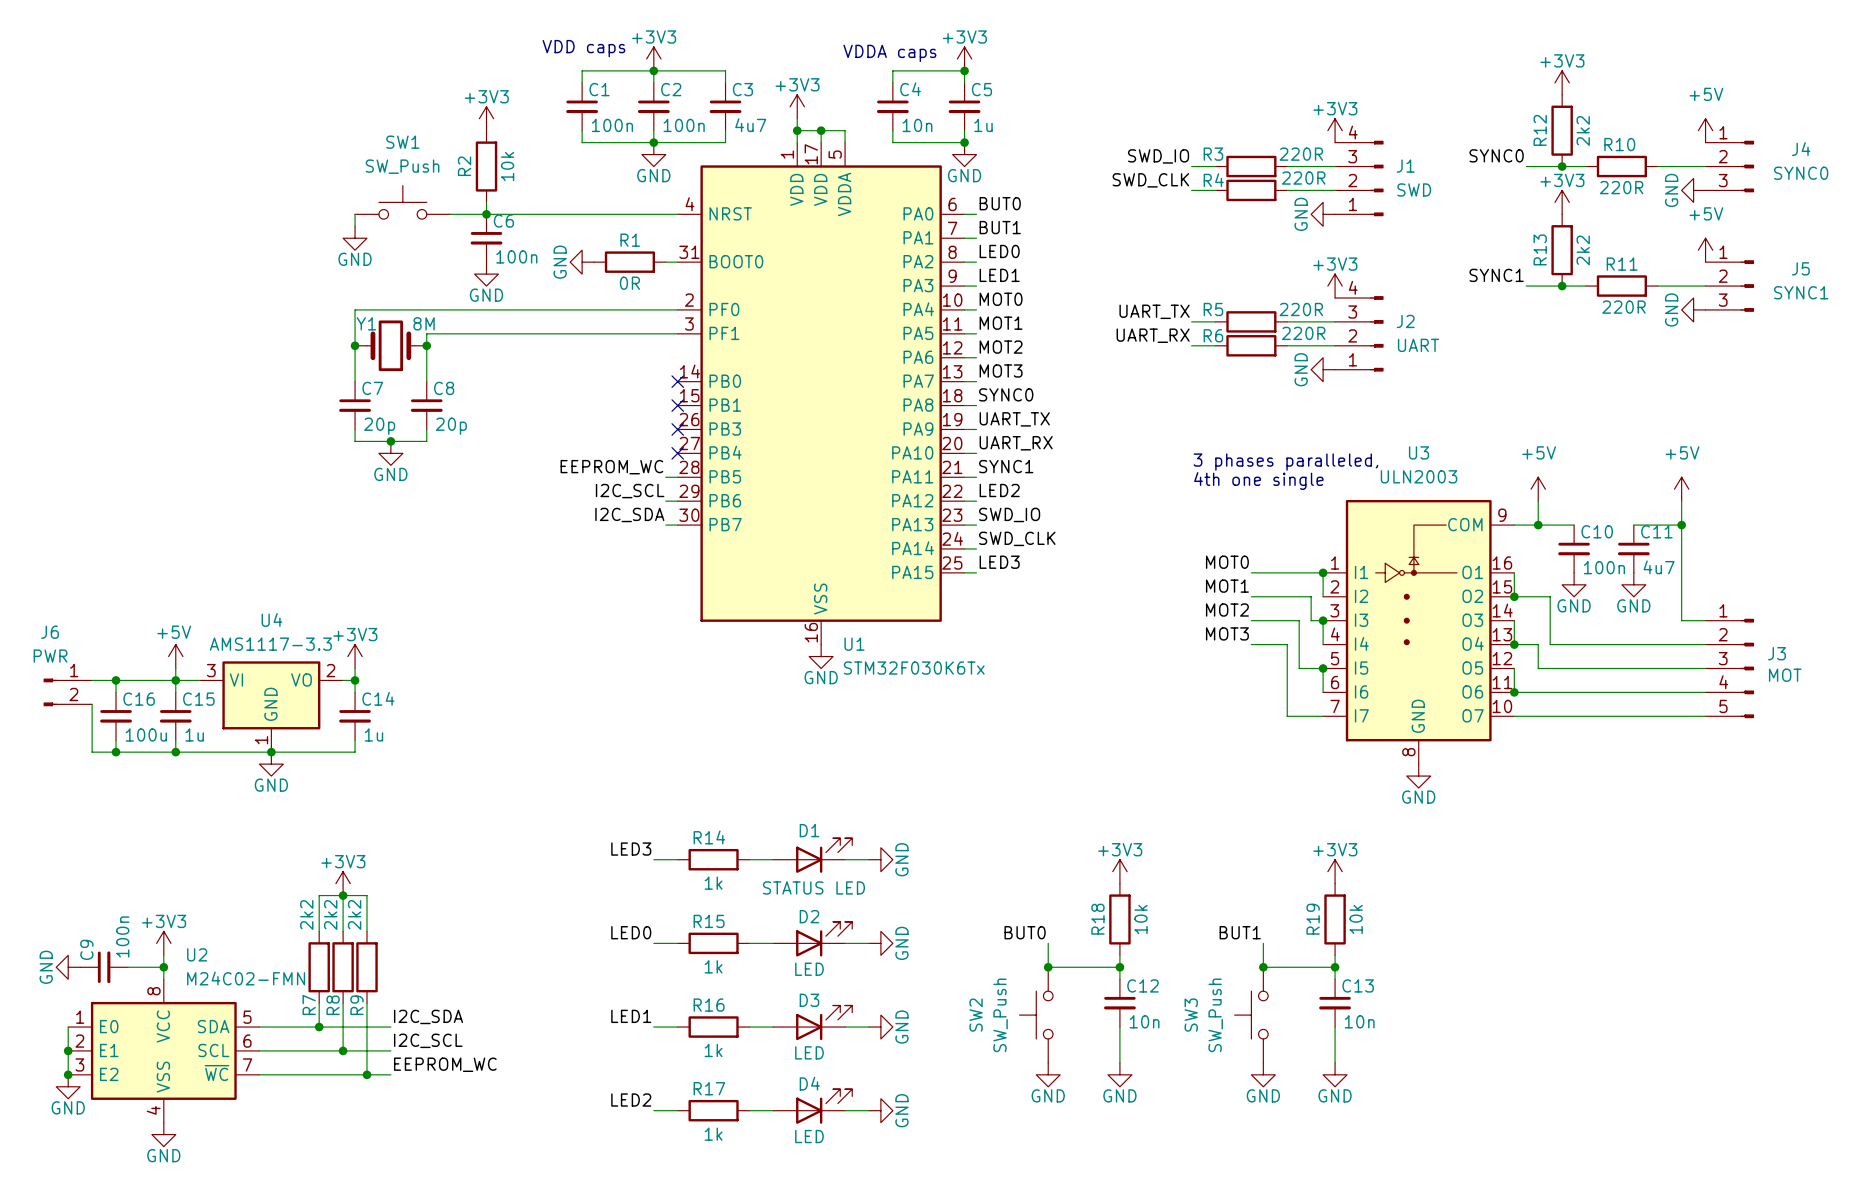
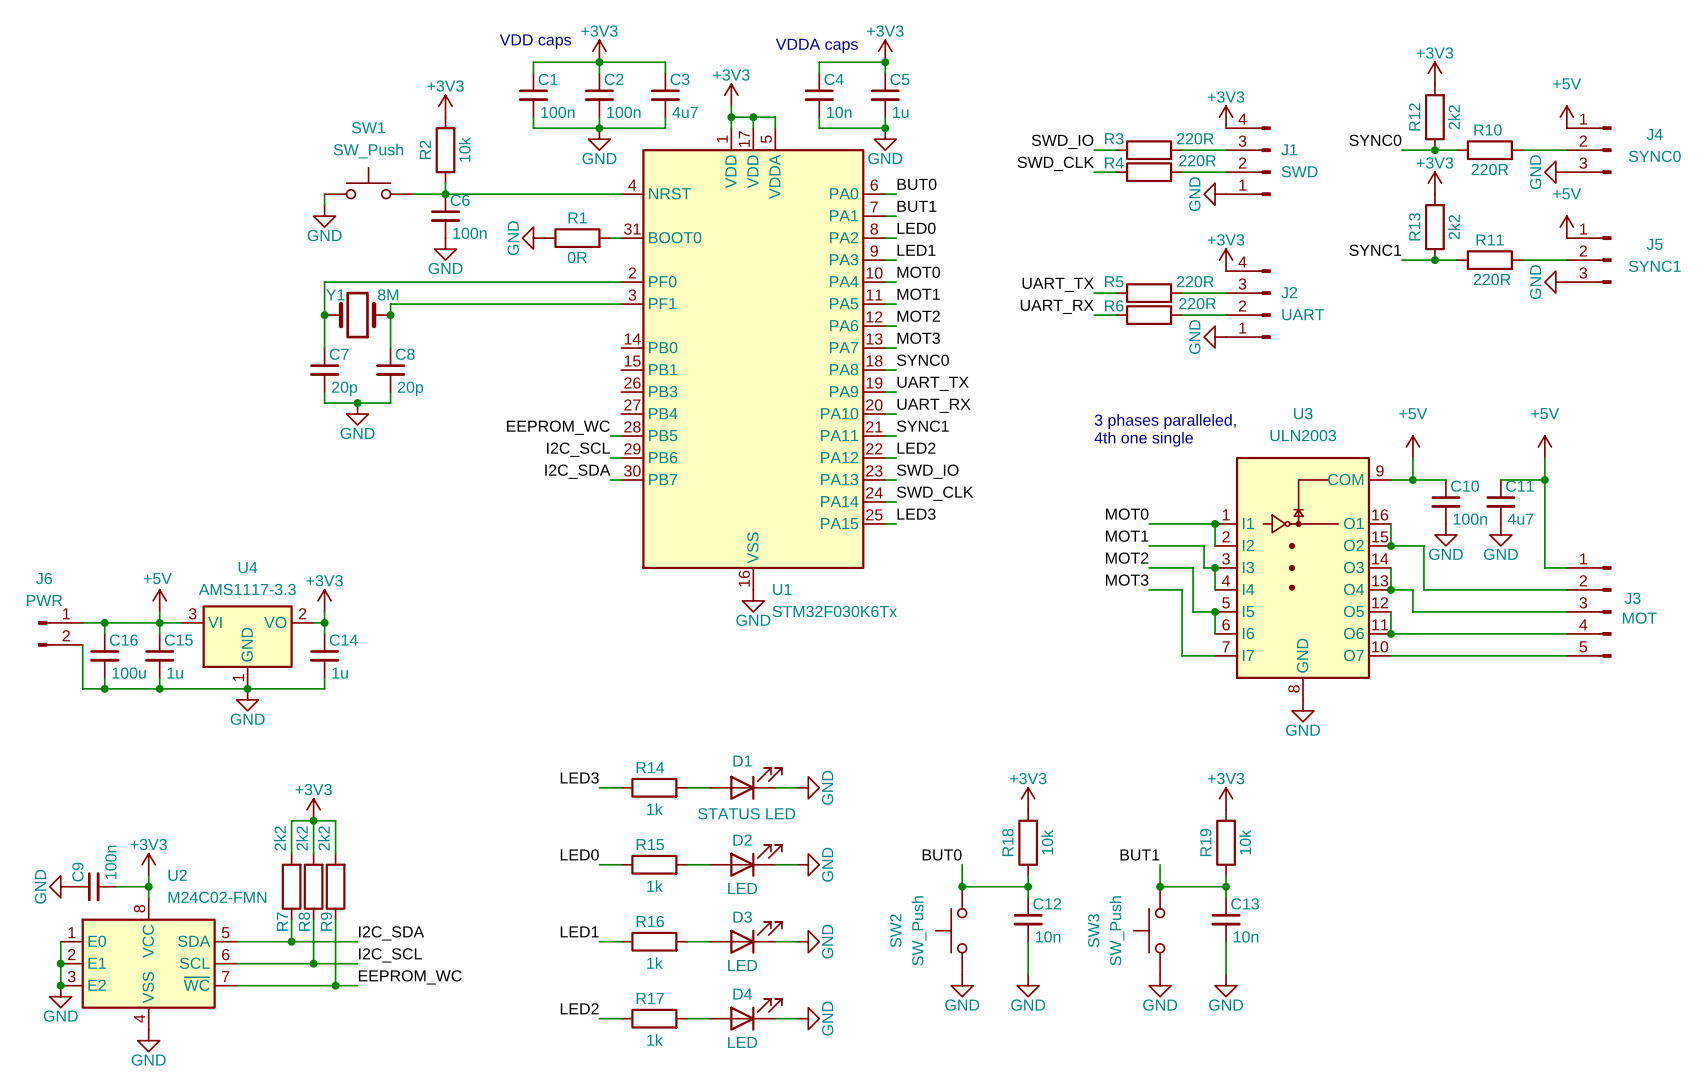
no-connect mark: (677, 381) -> none
no-connect mark: (677, 405) -> none
no-connect mark: (677, 429) -> none
no-connect mark: (677, 453) -> none

